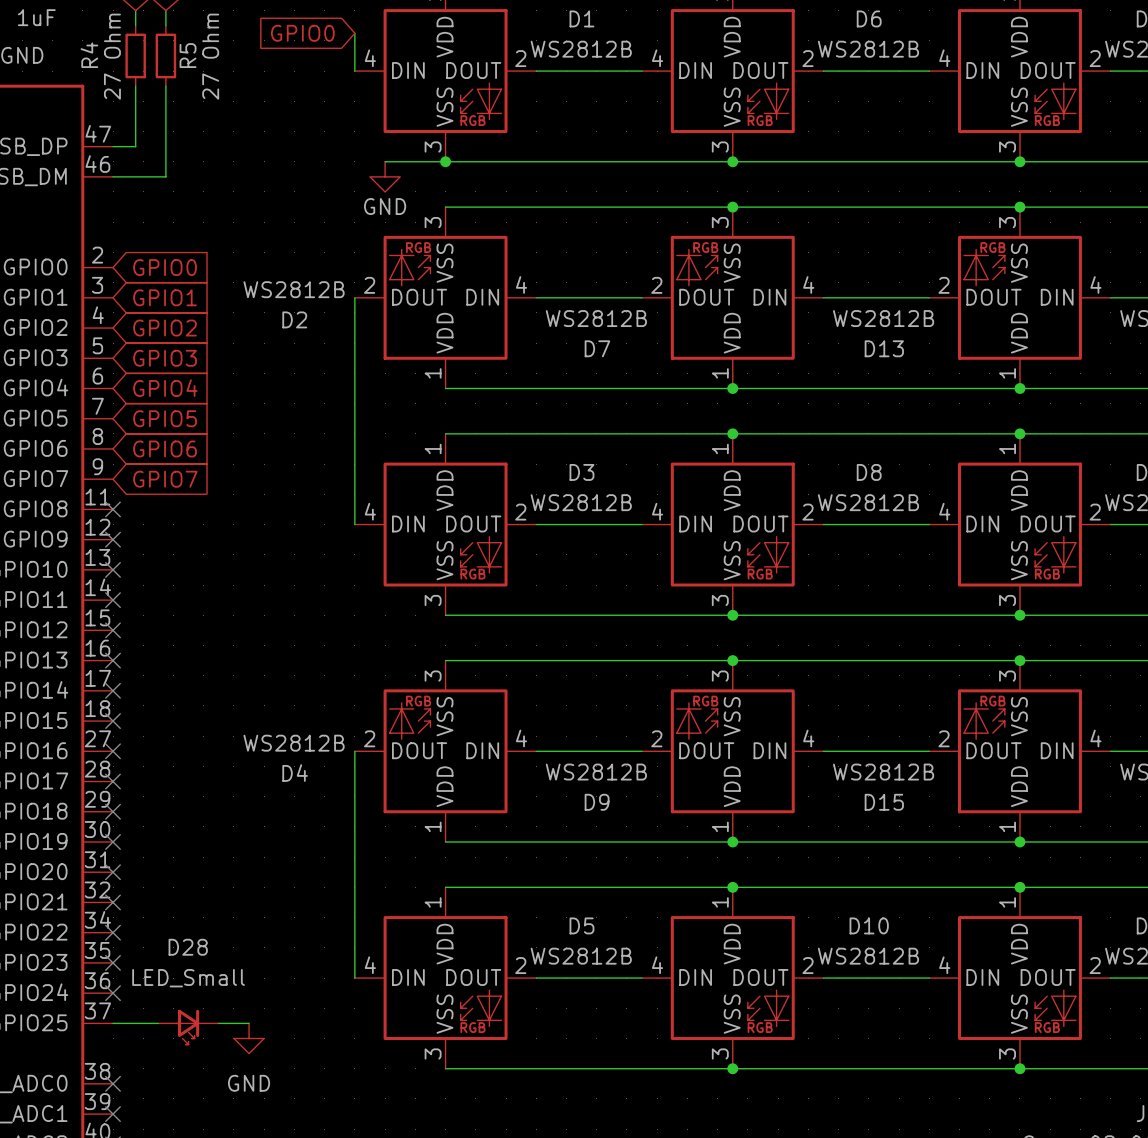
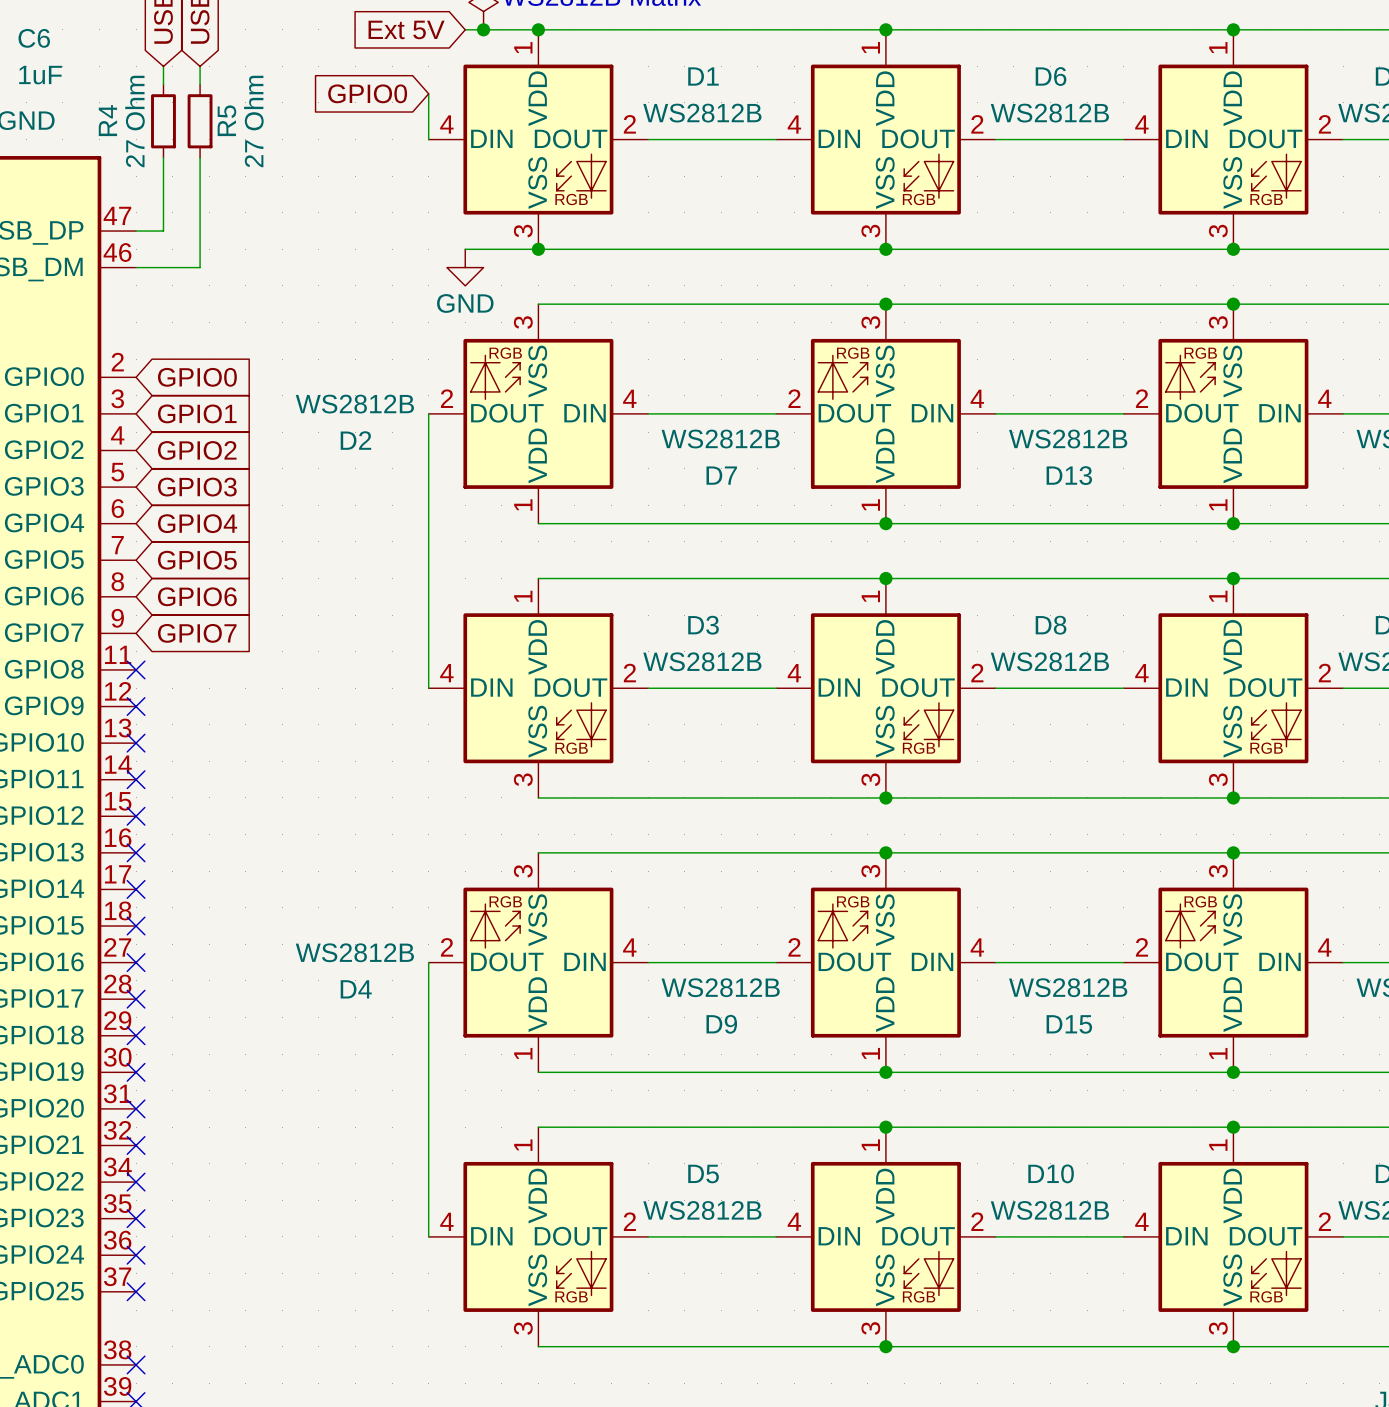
wire: (113, 1023) (158, 1023) -> none
no-connect mark: none -> (136, 1291)
wire: (218, 1023) (249, 1023) -> none
D28: LED_Small (188, 1027) -> none
power symbol: GND (249, 1038) -> none

